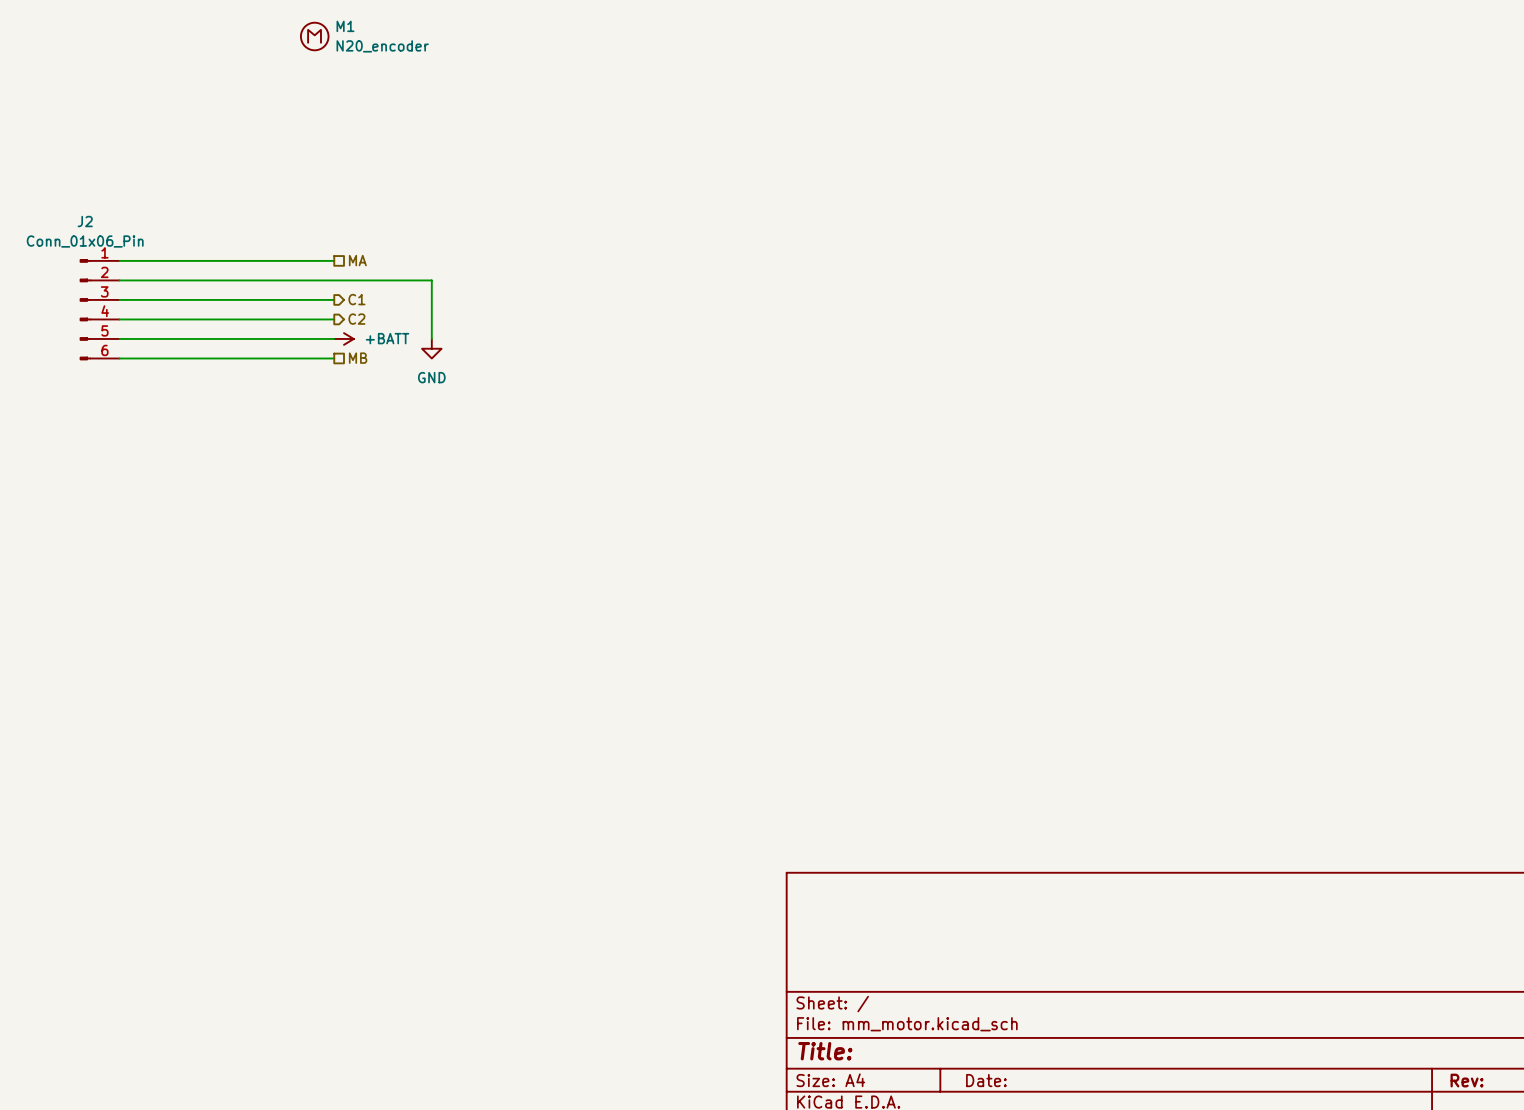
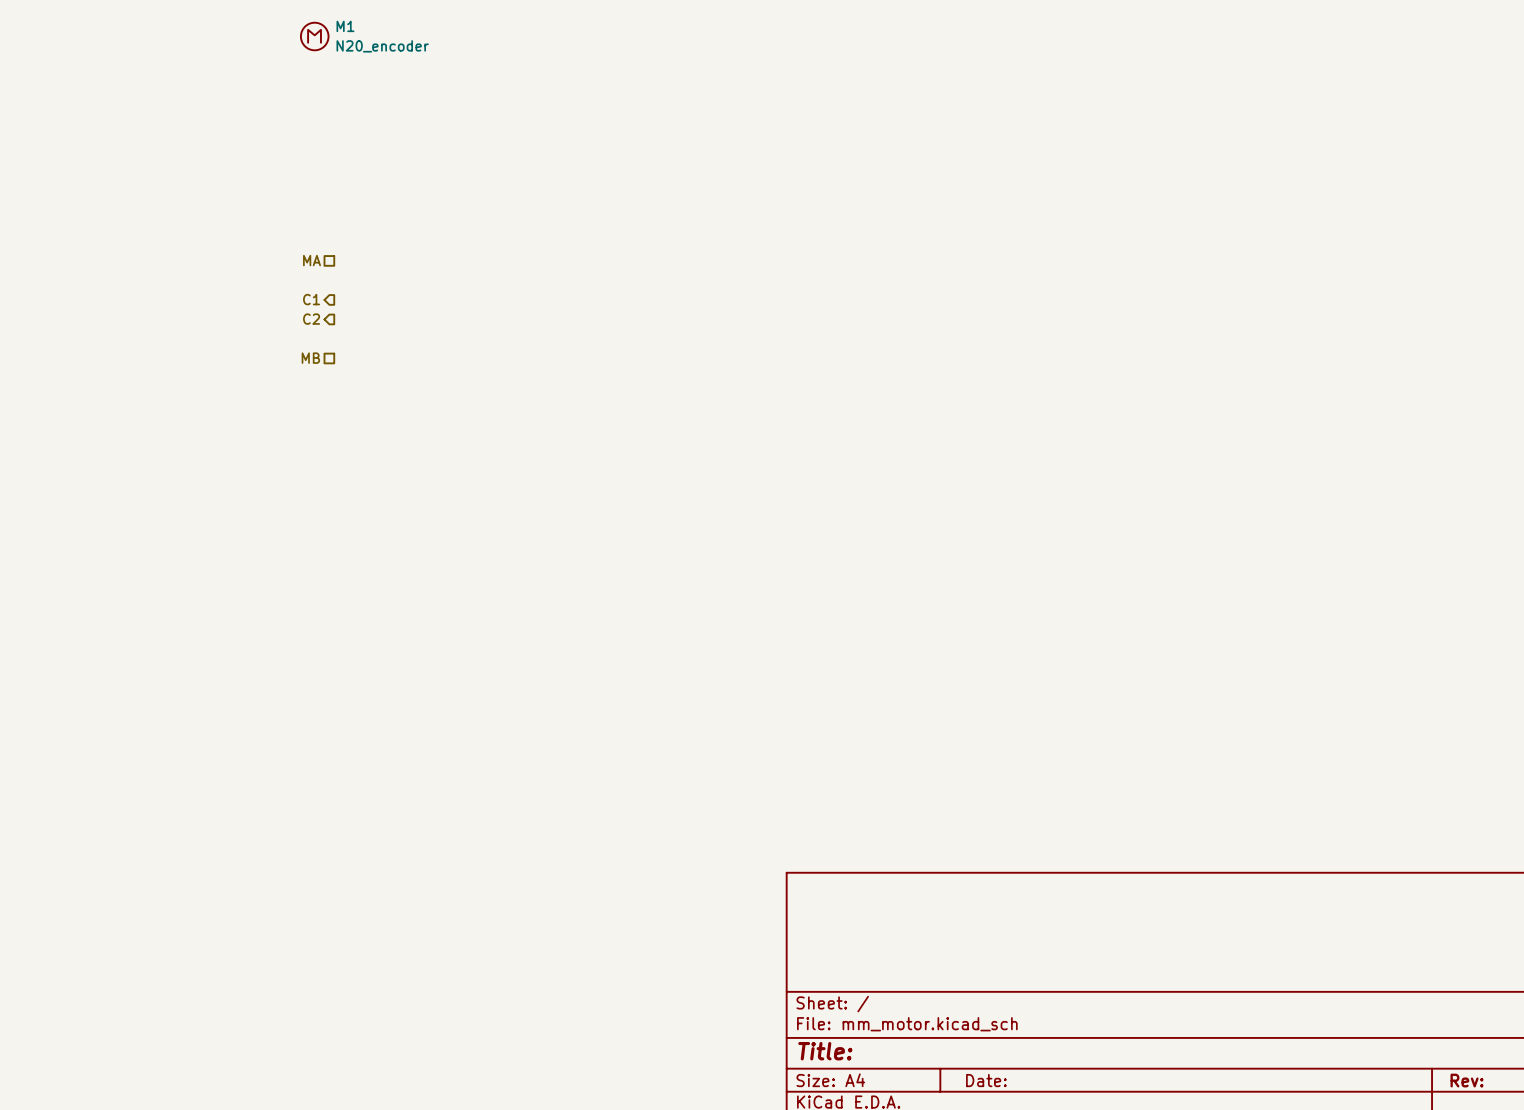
wire: (119, 260) (334, 260) -> none
hierarchical label rotation: 0° (357, 260) -> 180° (312, 260)
hierarchical label position: MA (357, 260) -> MA (312, 260)
wire: (119, 280) (431, 280) (431, 338) -> none
wire: (119, 299) (334, 299) -> none
hierarchical label rotation: 0° (356, 299) -> 180° (311, 299)
hierarchical label position: C1 (356, 299) -> C1 (311, 299)
J2: Conn_01x06_Pin (99, 309) -> none
wire: (119, 319) (334, 319) -> none
hierarchical label rotation: 0° (356, 319) -> 180° (311, 319)
hierarchical label position: C2 (356, 319) -> C2 (311, 319)
wire: (119, 338) (334, 338) -> none
power symbol: +BATT (344, 338) -> none
power symbol: GND (431, 348) -> none
wire: (119, 358) (334, 358) -> none
hierarchical label rotation: 0° (358, 358) -> 180° (310, 358)
hierarchical label position: MB (358, 358) -> MB (310, 358)

